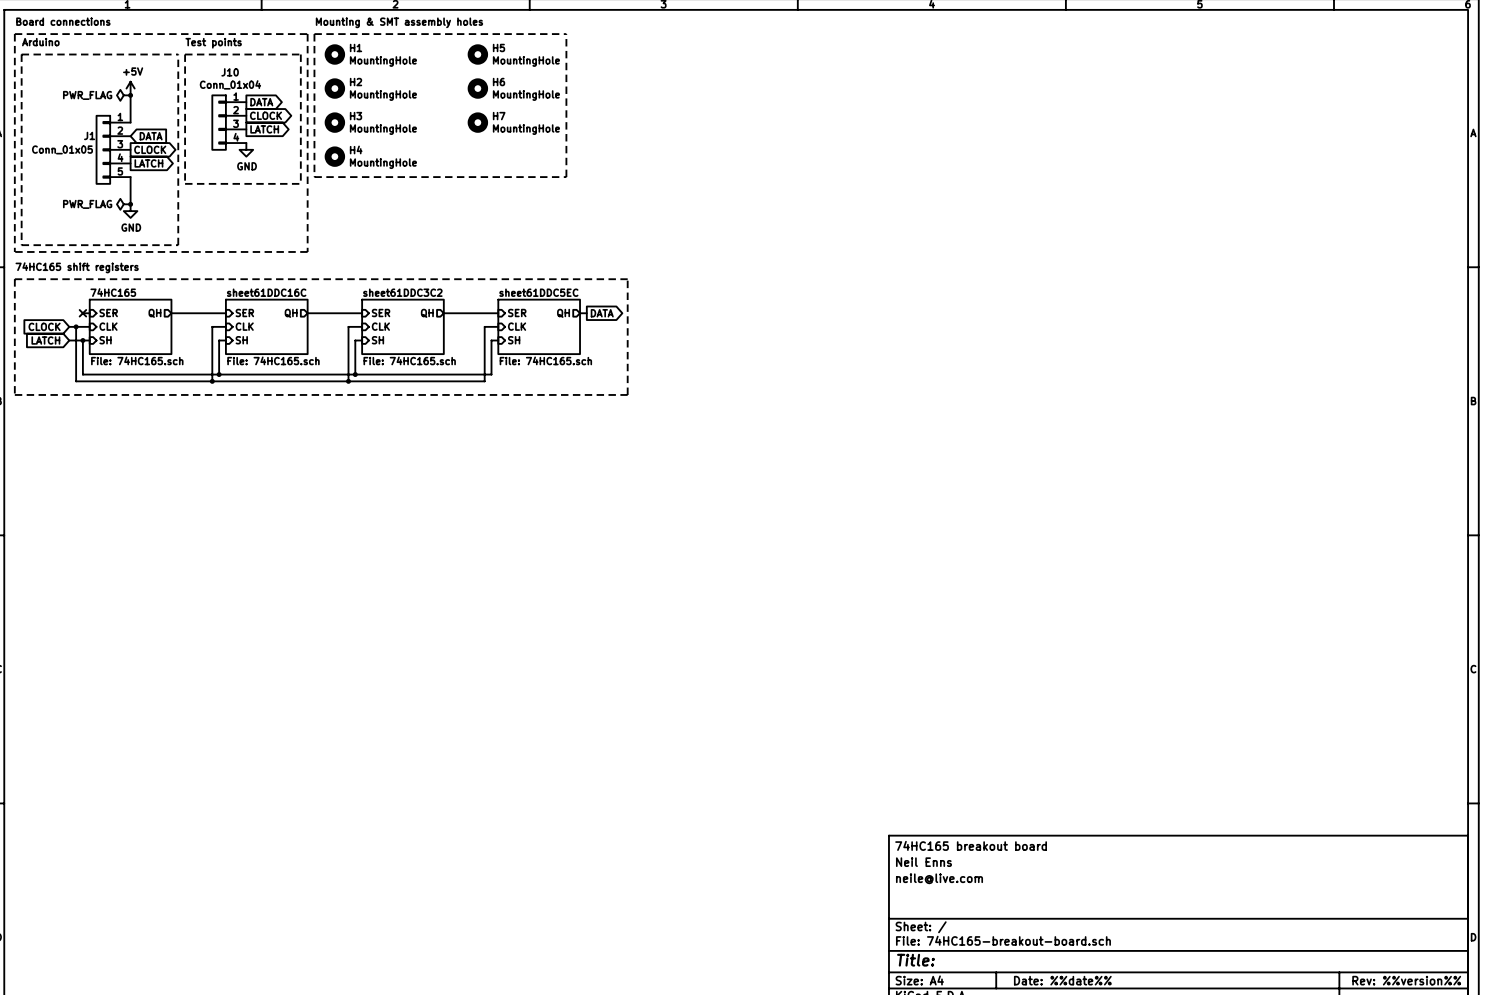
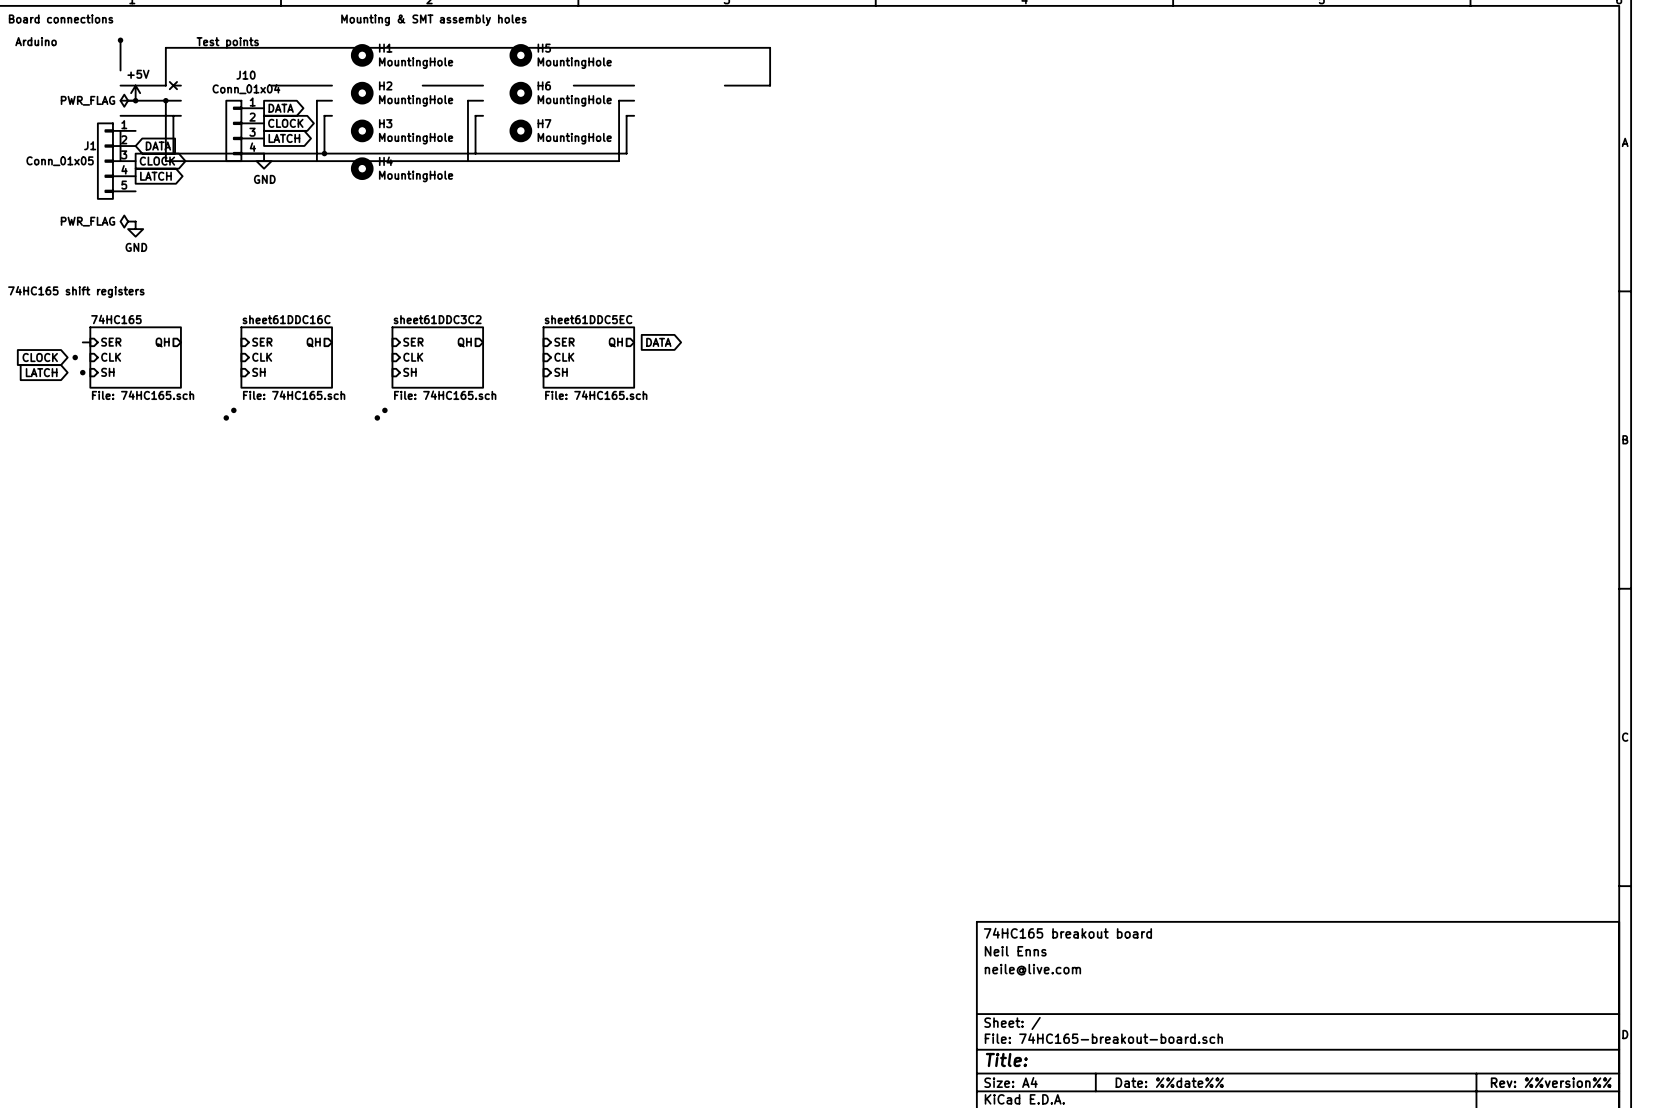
line: (14, 34) (307, 34) (307, 251) (14, 251) (14, 34) -> none
line: (314, 34) (314, 177) (566, 177) (566, 34) (314, 34) -> none
junction: none -> (120, 40)
line: (21, 54) (21, 245) (178, 245) (178, 54) (21, 54) -> none
line: (185, 54) (300, 54) (300, 183) (185, 183) (185, 54) -> none
wire: none -> (120, 85) (165, 85) (165, 47) (770, 47) (770, 85) (724, 85)
wire: none -> (173, 85) (180, 85)
no-connect mark: none -> (173, 85)
wire: none -> (271, 85) (332, 85)
wire: none -> (422, 85) (483, 85)
wire: none -> (573, 85) (634, 85)
wire: none -> (120, 100) (180, 100)
wire: (130, 95) (130, 122) -> (120, 40) (120, 70)
wire: none -> (165, 100) (165, 161) (619, 161) (619, 100) (634, 100)
junction: none -> (165, 100)
wire: none -> (332, 100) (316, 100) (316, 161)
wire: none -> (483, 100) (467, 100) (467, 161)
wire: none -> (120, 115) (180, 115)
wire: none -> (173, 115) (173, 153) (626, 153) (626, 115) (634, 115)
wire: none -> (332, 115) (324, 115) (324, 153)
wire: none -> (483, 115) (475, 115) (475, 153)
junction: none -> (324, 153)
wire: (130, 177) (130, 204) -> (120, 130) (120, 161)
junction: (130, 204) -> none
line: (14, 279) (14, 394) (627, 394) (627, 279) (14, 279) -> none
no-connect mark: (82, 313) -> none
wire: (171, 313) (225, 313) -> none
wire: (307, 313) (362, 313) -> none
wire: (443, 313) (498, 313) -> none
wire: (580, 313) (586, 313) -> none
wire: (69, 326) (89, 326) -> none
wire: (76, 326) (76, 381) (484, 381) (484, 326) (498, 326) -> none
wire: (225, 326) (212, 326) (212, 381) -> none
wire: (362, 326) (348, 326) (348, 381) -> none
wire: (69, 340) (89, 340) -> none
wire: (82, 340) (82, 374) (491, 374) (491, 340) (498, 340) -> none
wire: (225, 340) (219, 340) (219, 374) -> none
wire: (362, 340) (355, 340) (355, 374) -> none

